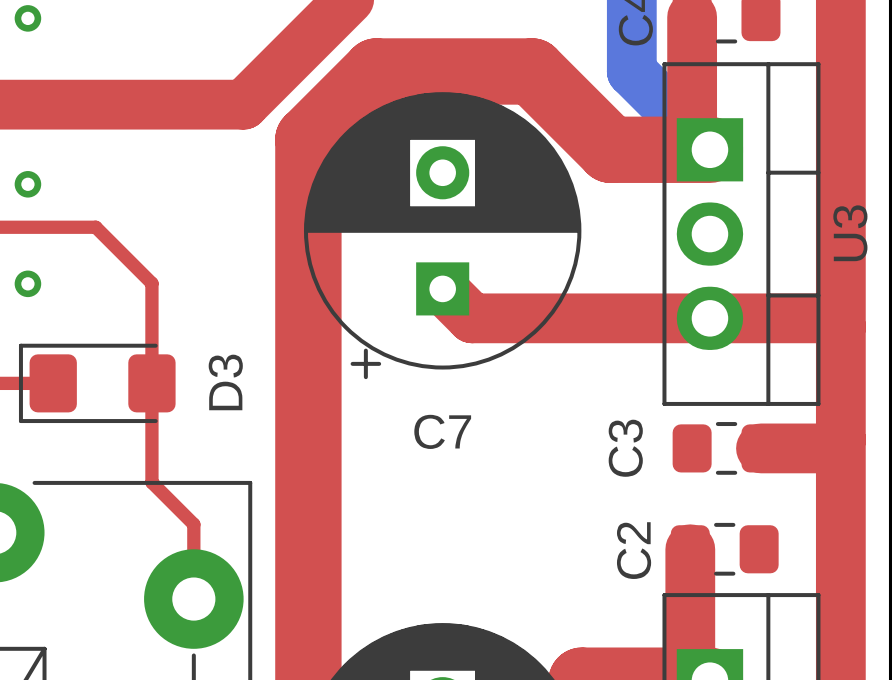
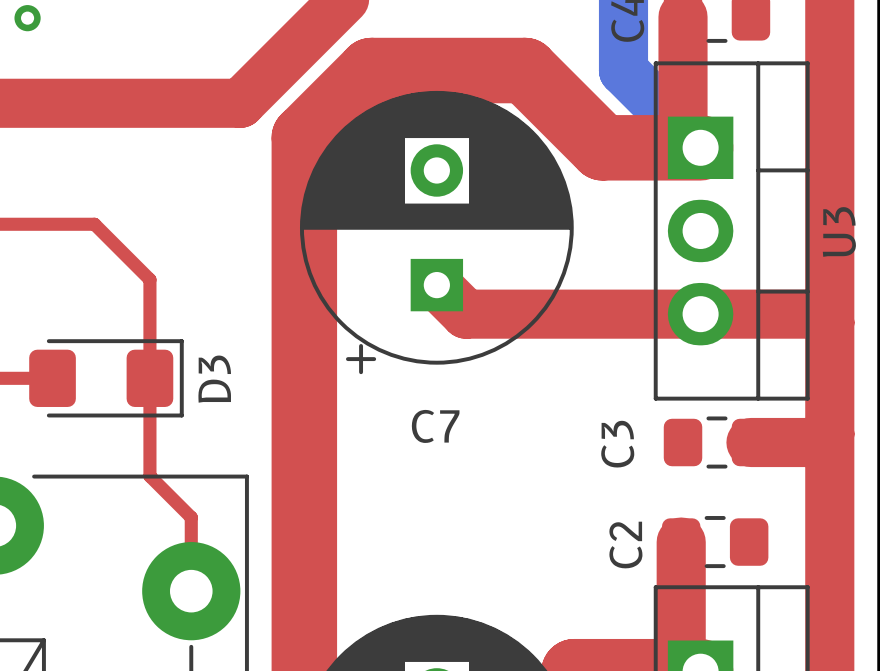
via: (27, 184) -> none
via: (27, 283) -> none
D3 rotation: 0° (97, 383) -> 180° (106, 378)

